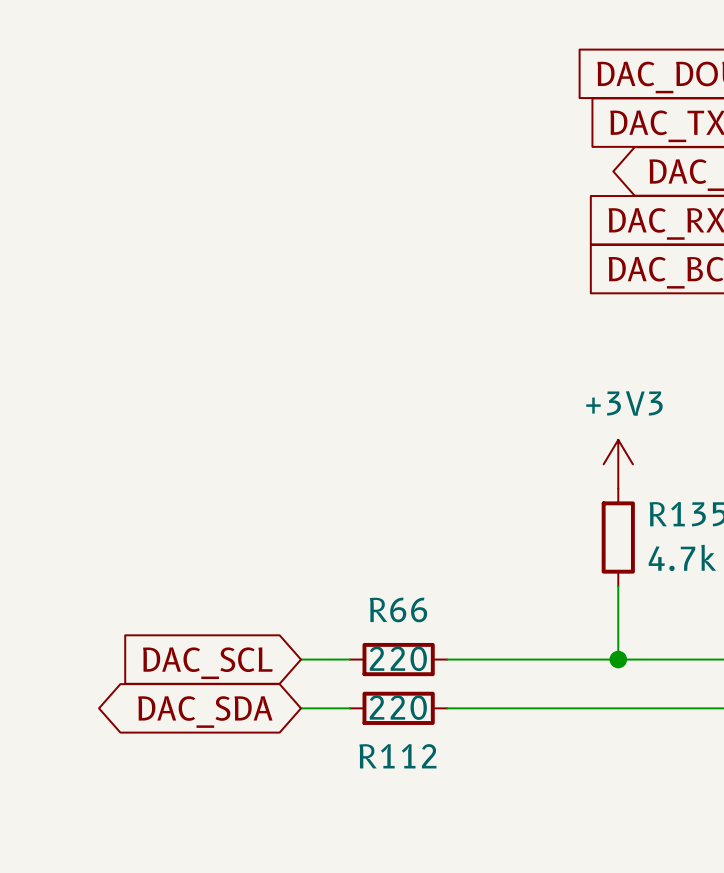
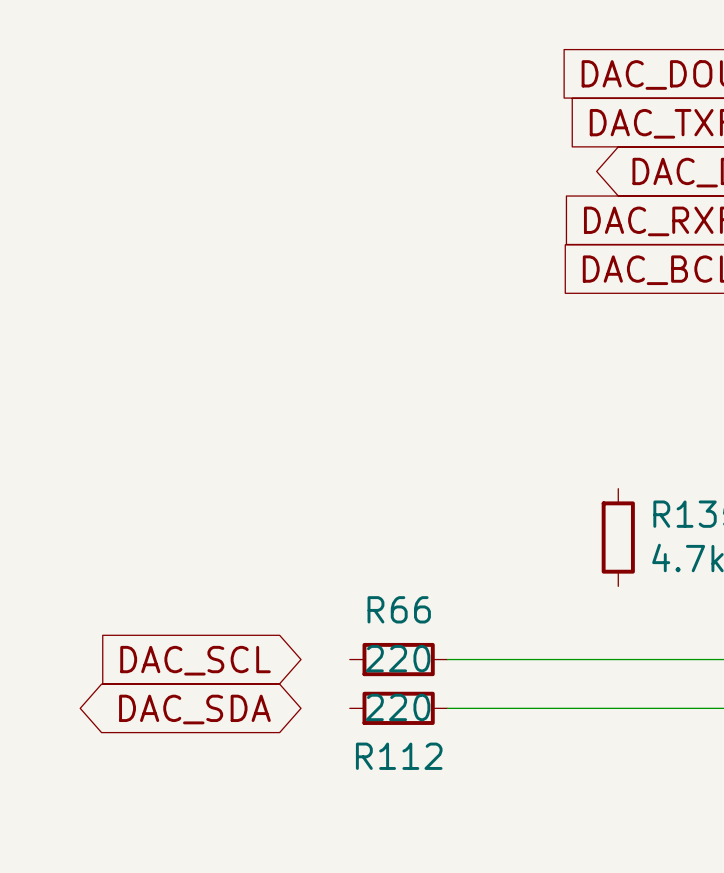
power symbol: +3V3 (618, 464) -> none
wire: (618, 586) (618, 659) -> none
wire: (301, 659) (349, 659) -> none
junction: (618, 659) -> none
wire: (301, 708) (349, 708) -> none

